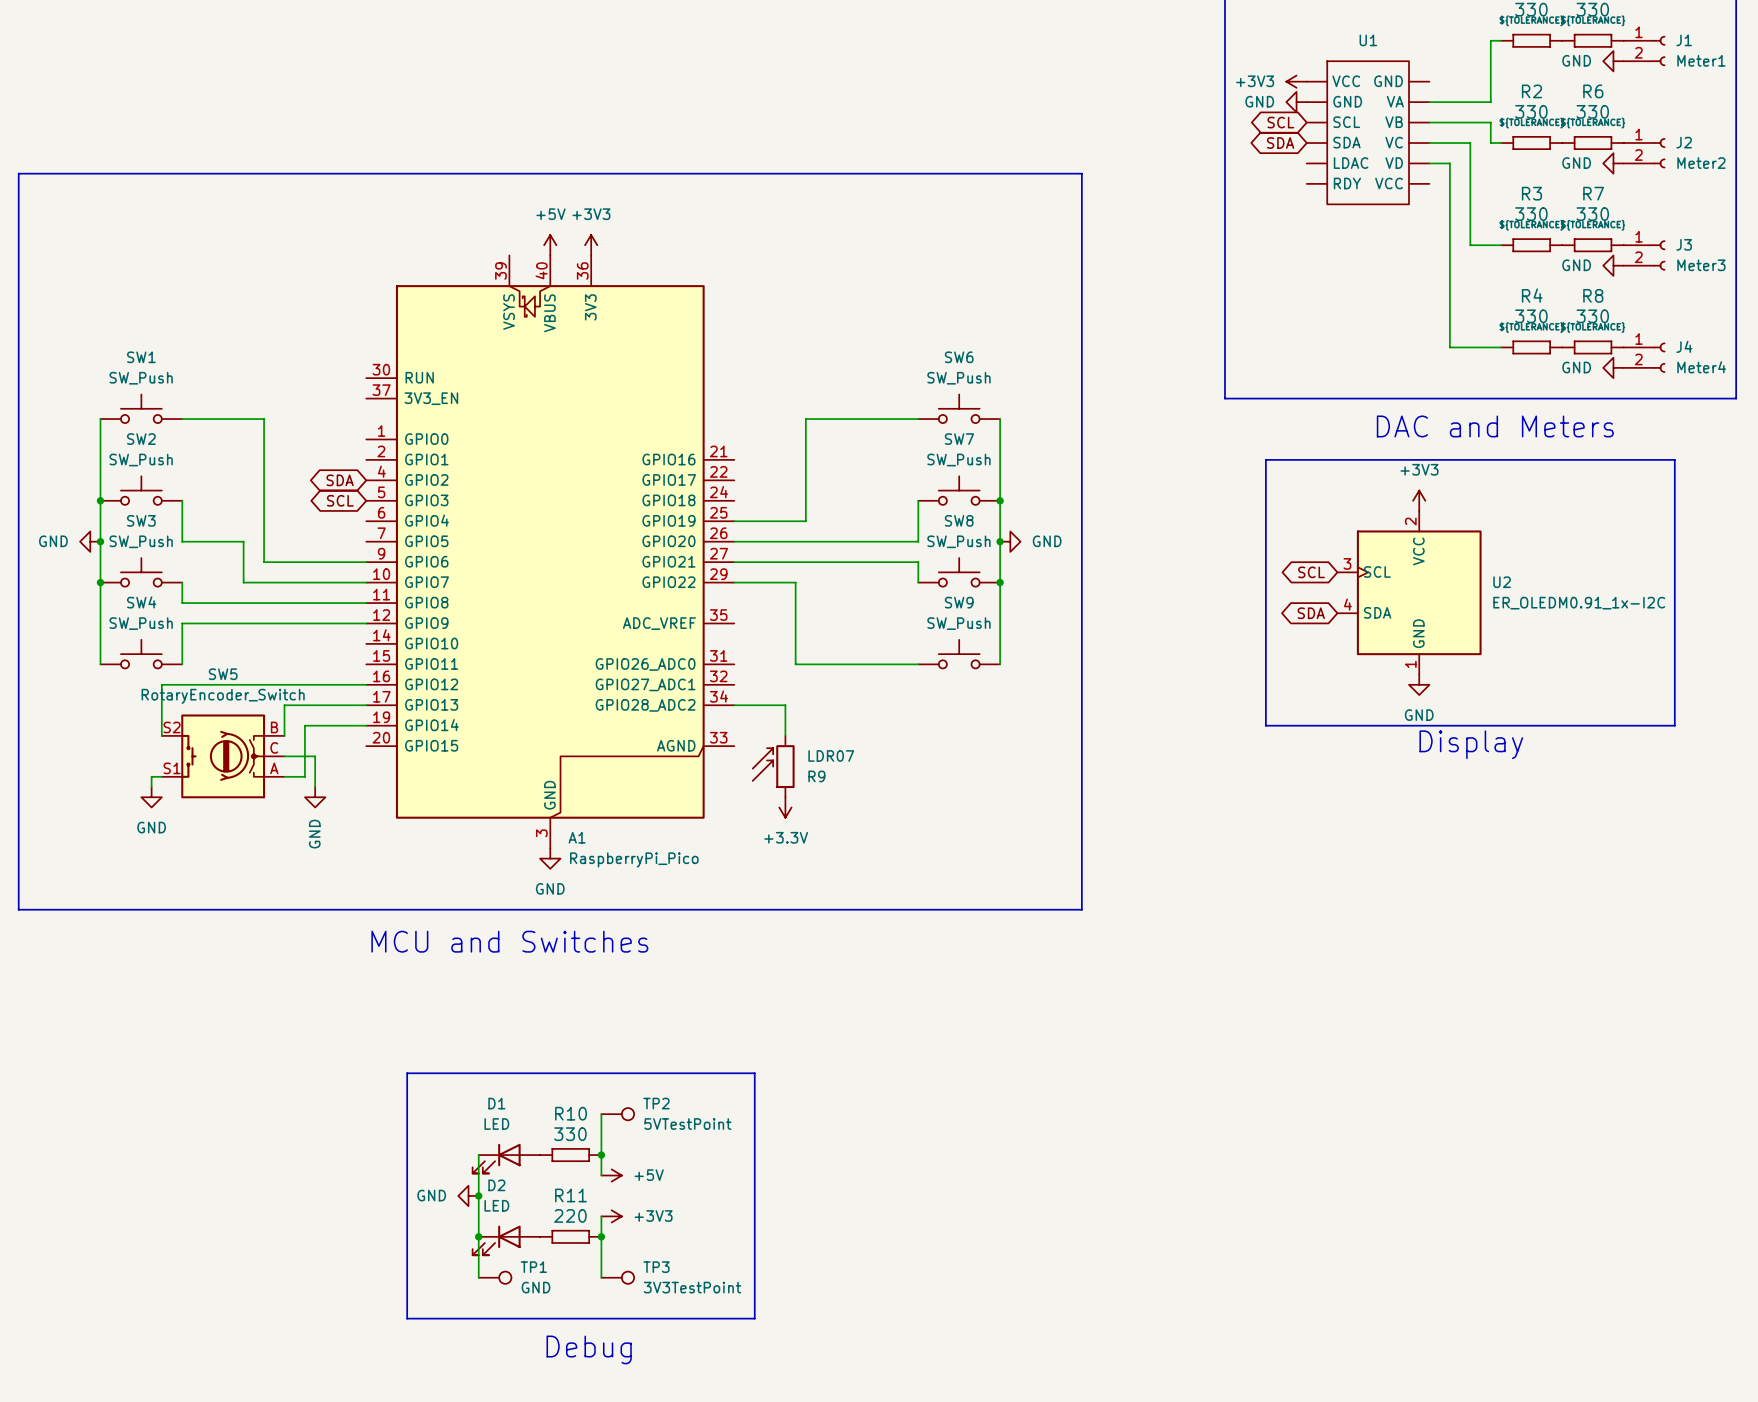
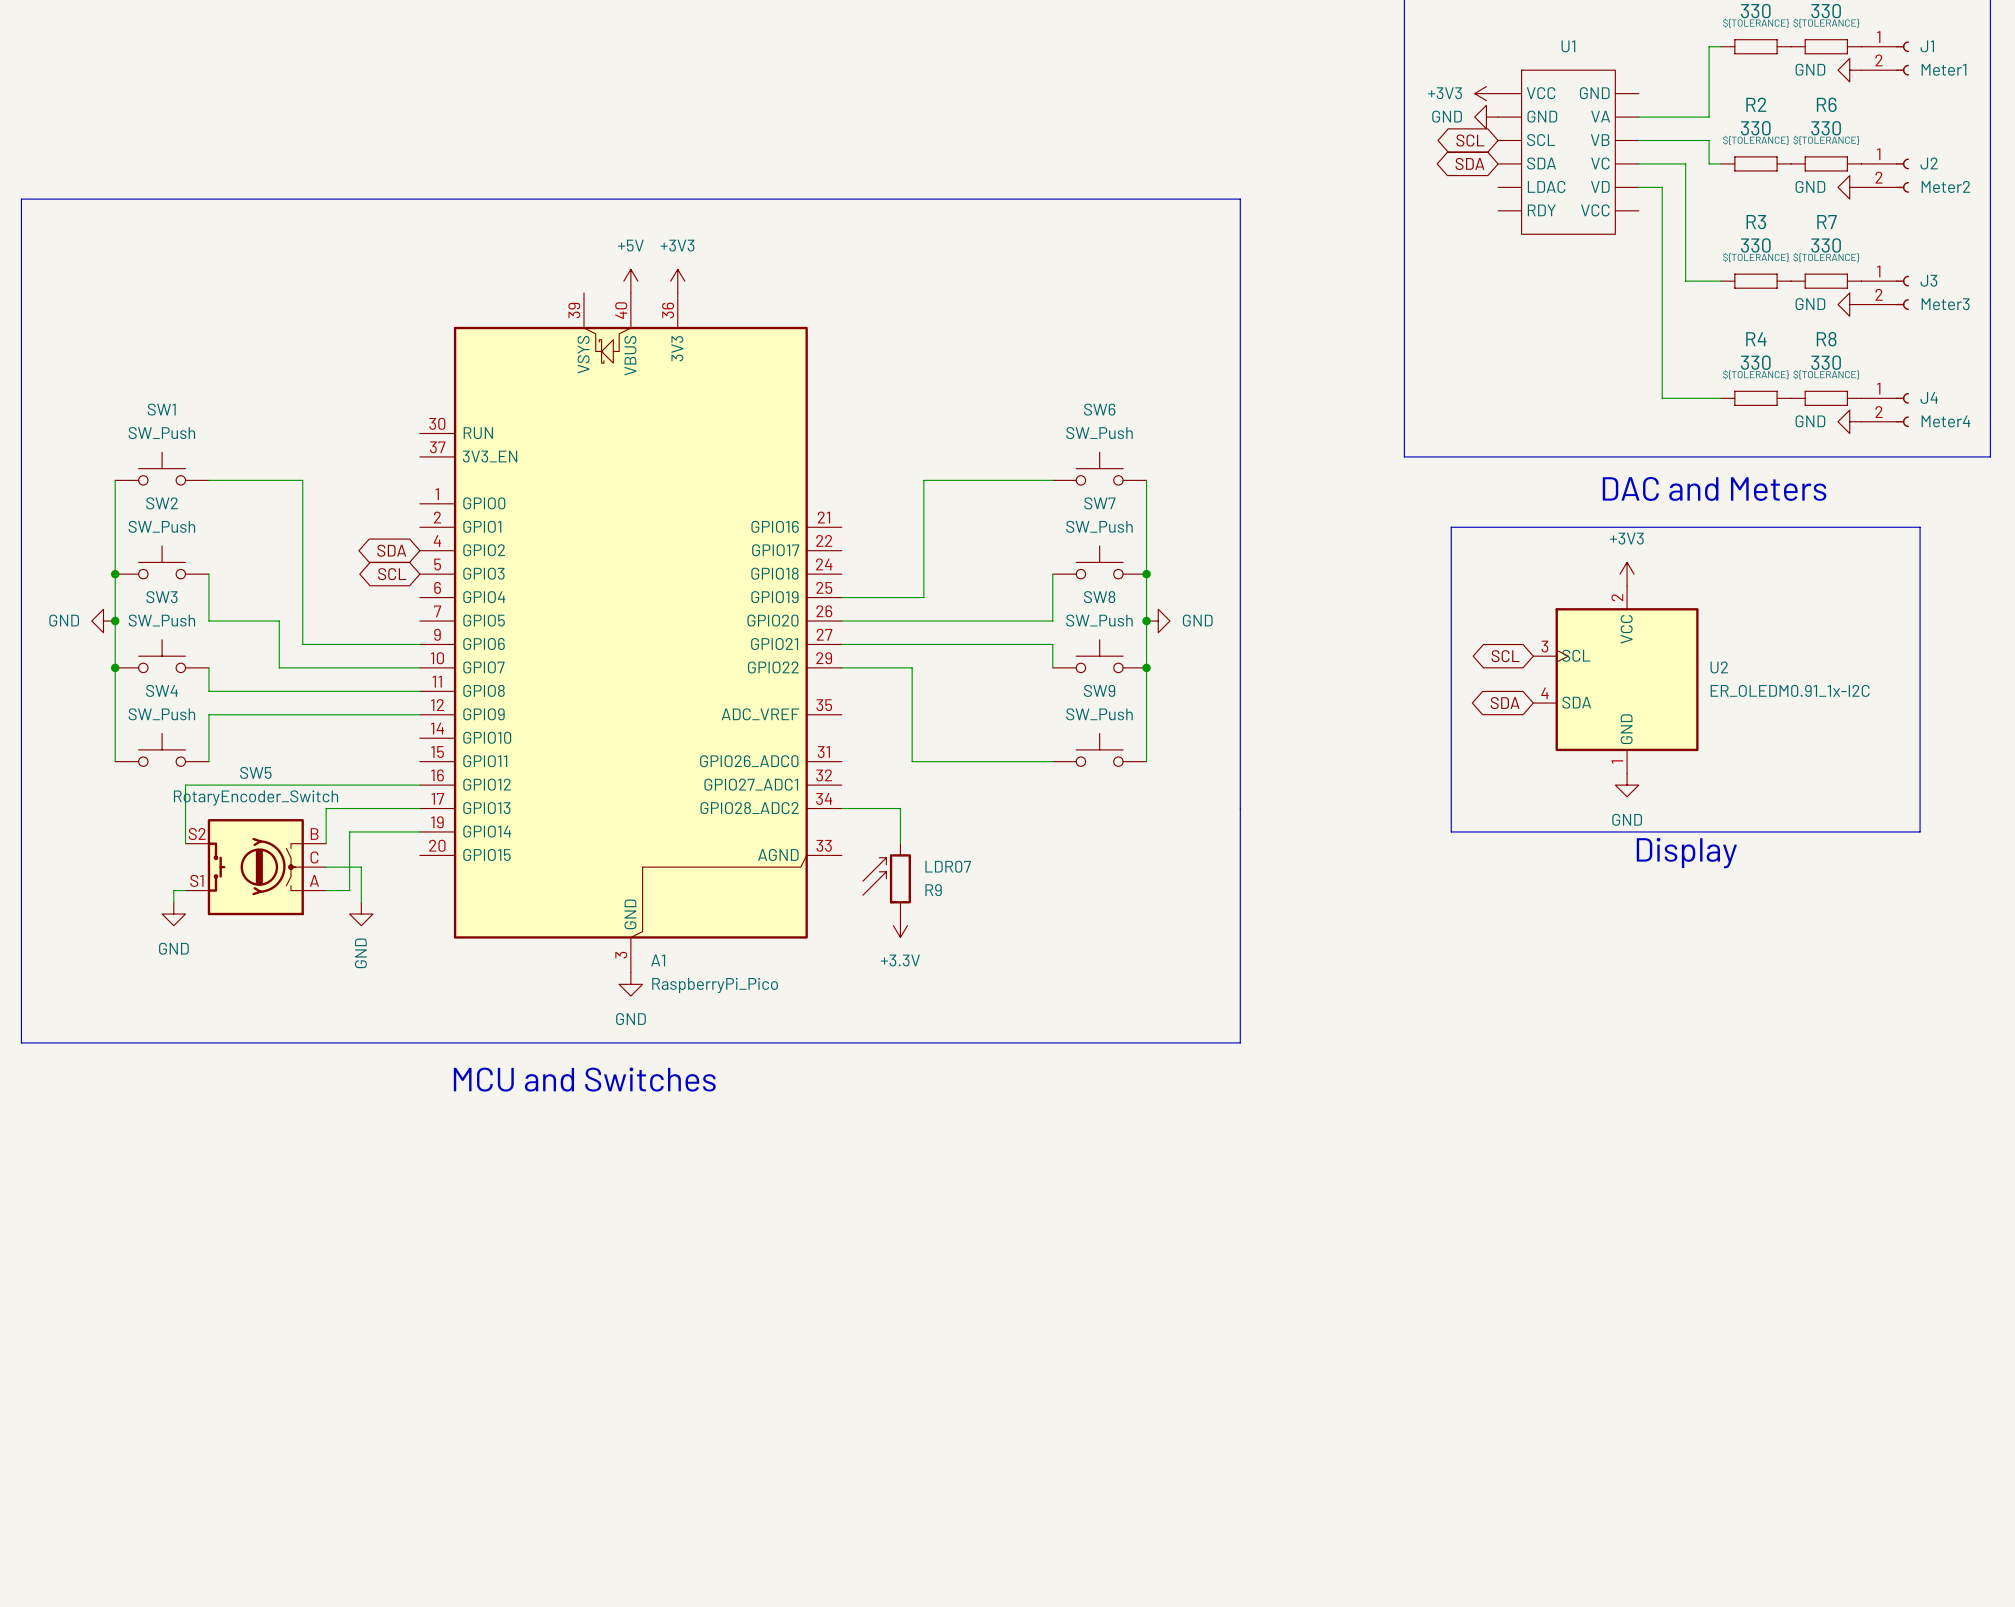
line: (407, 1073) (754, 1073) (754, 1318) (407, 1318) (407, 1073) -> none
wire: (601, 1114) (601, 1175) -> none
TP2: 5VTestPoint (617, 1114) -> none
wire: (478, 1155) (478, 1277) -> none
R10: 330 (570, 1155) -> none
junction: (601, 1155) -> none
D1: LED (506, 1158) -> none
power symbol: +5V (611, 1175) -> none
power symbol: GND (468, 1195) -> none
junction: (478, 1195) -> none
wire: (601, 1216) (601, 1277) -> none
power symbol: +3V3 (611, 1216) -> none
junction: (478, 1236) -> none
R11: 220 (570, 1236) -> none
junction: (601, 1236) -> none
D2: LED (506, 1240) -> none
TP1: GND (495, 1277) -> none
TP3: 3V3TestPoint (617, 1277) -> none
text: Debug (589, 1349) -> none

